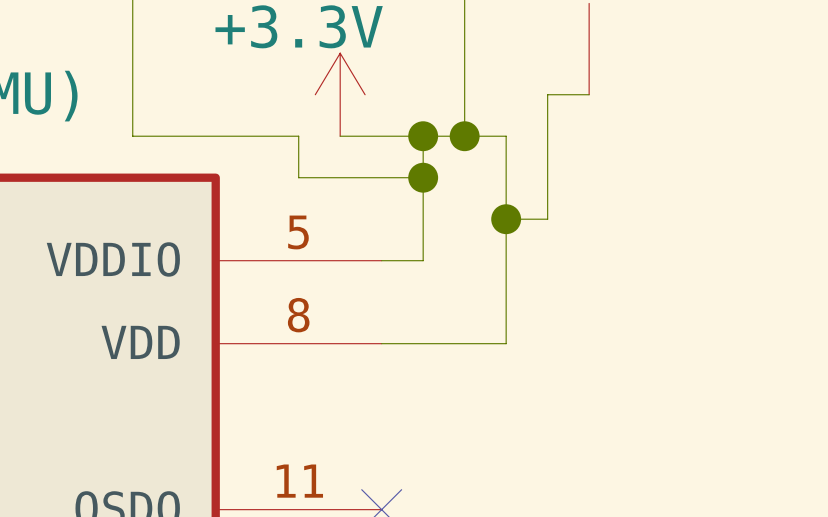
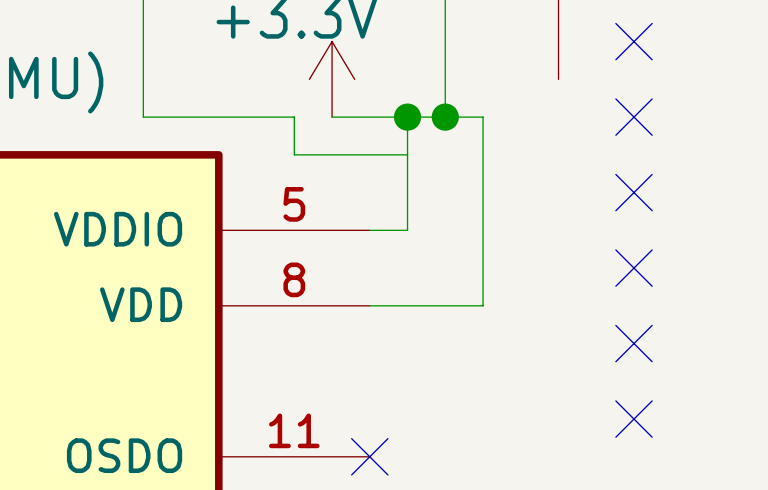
no-connect mark: none -> (634, 41)
wire: (589, 94) (547, 94) (547, 219) (506, 219) -> none
no-connect mark: none -> (634, 117)
junction: (423, 177) -> none
junction: (506, 219) -> none
no-connect mark: none -> (634, 192)
no-connect mark: none -> (634, 268)
no-connect mark: none -> (634, 343)
no-connect mark: none -> (634, 419)

